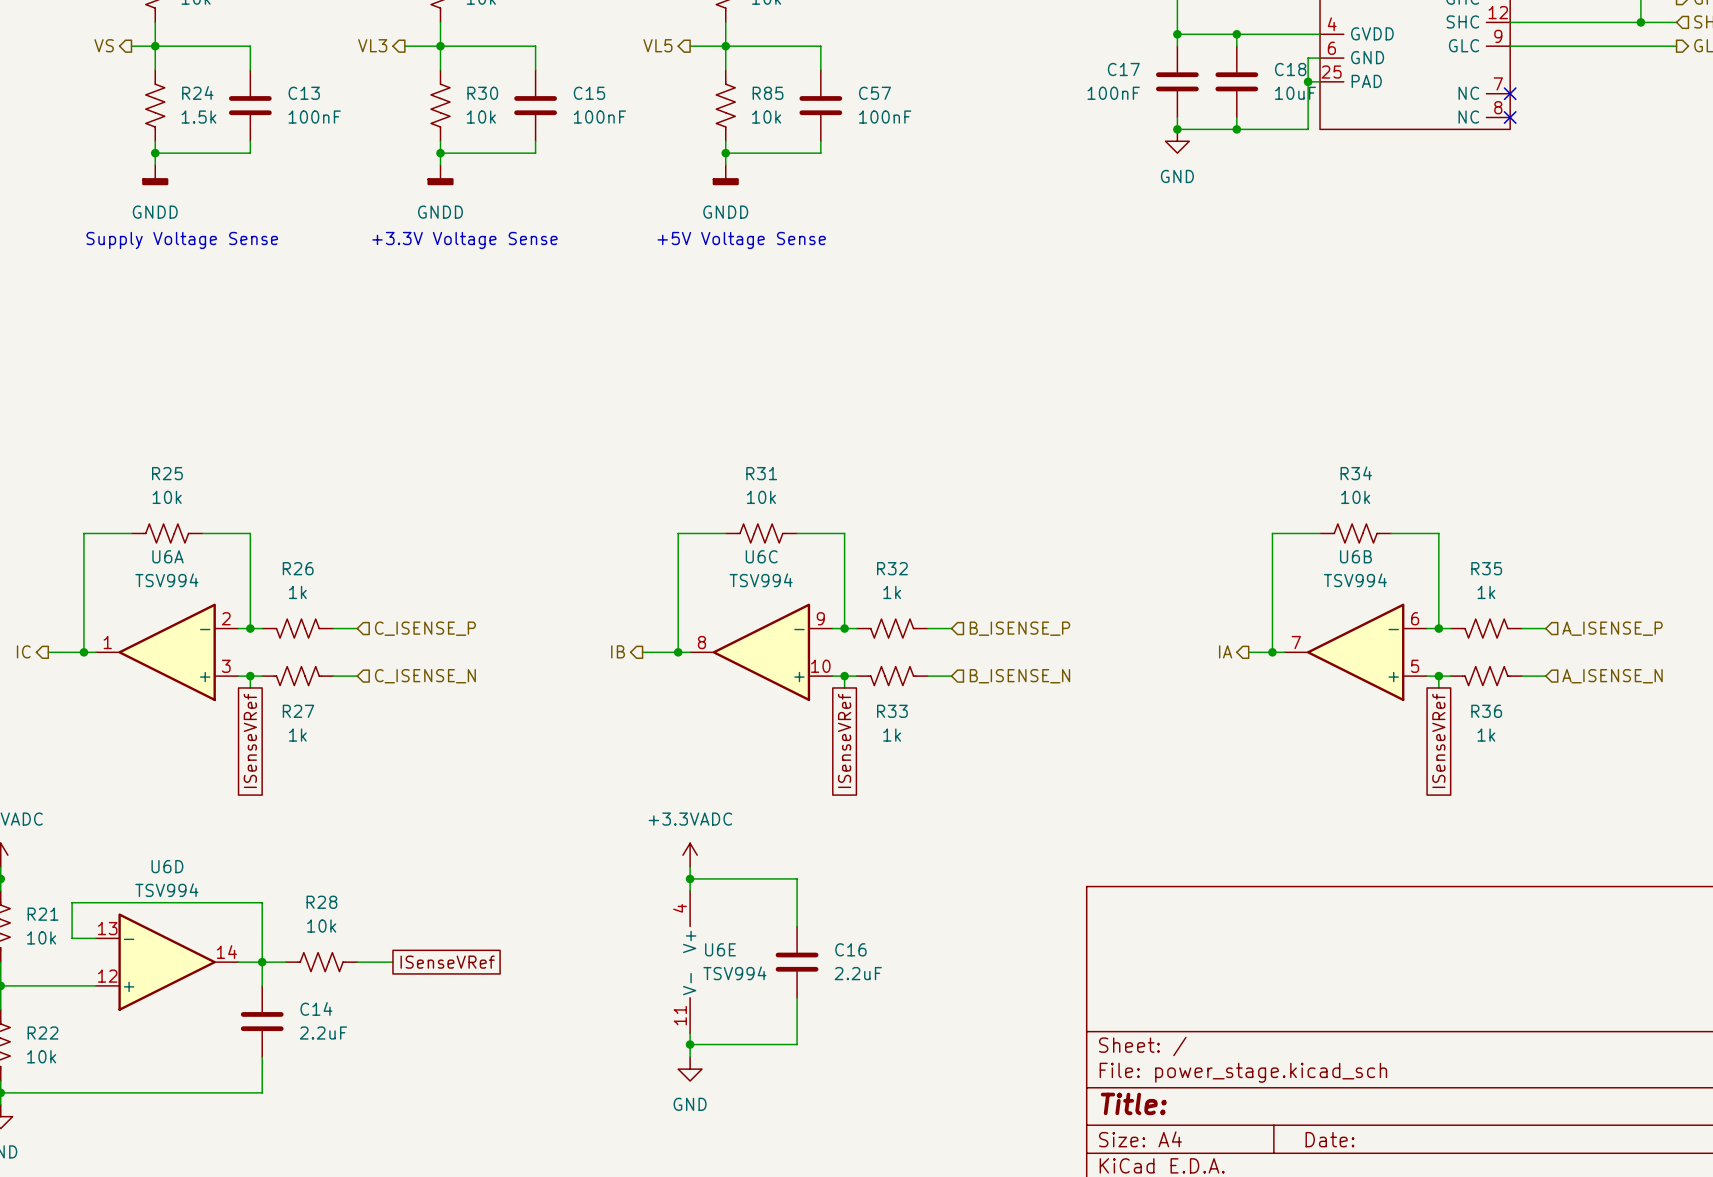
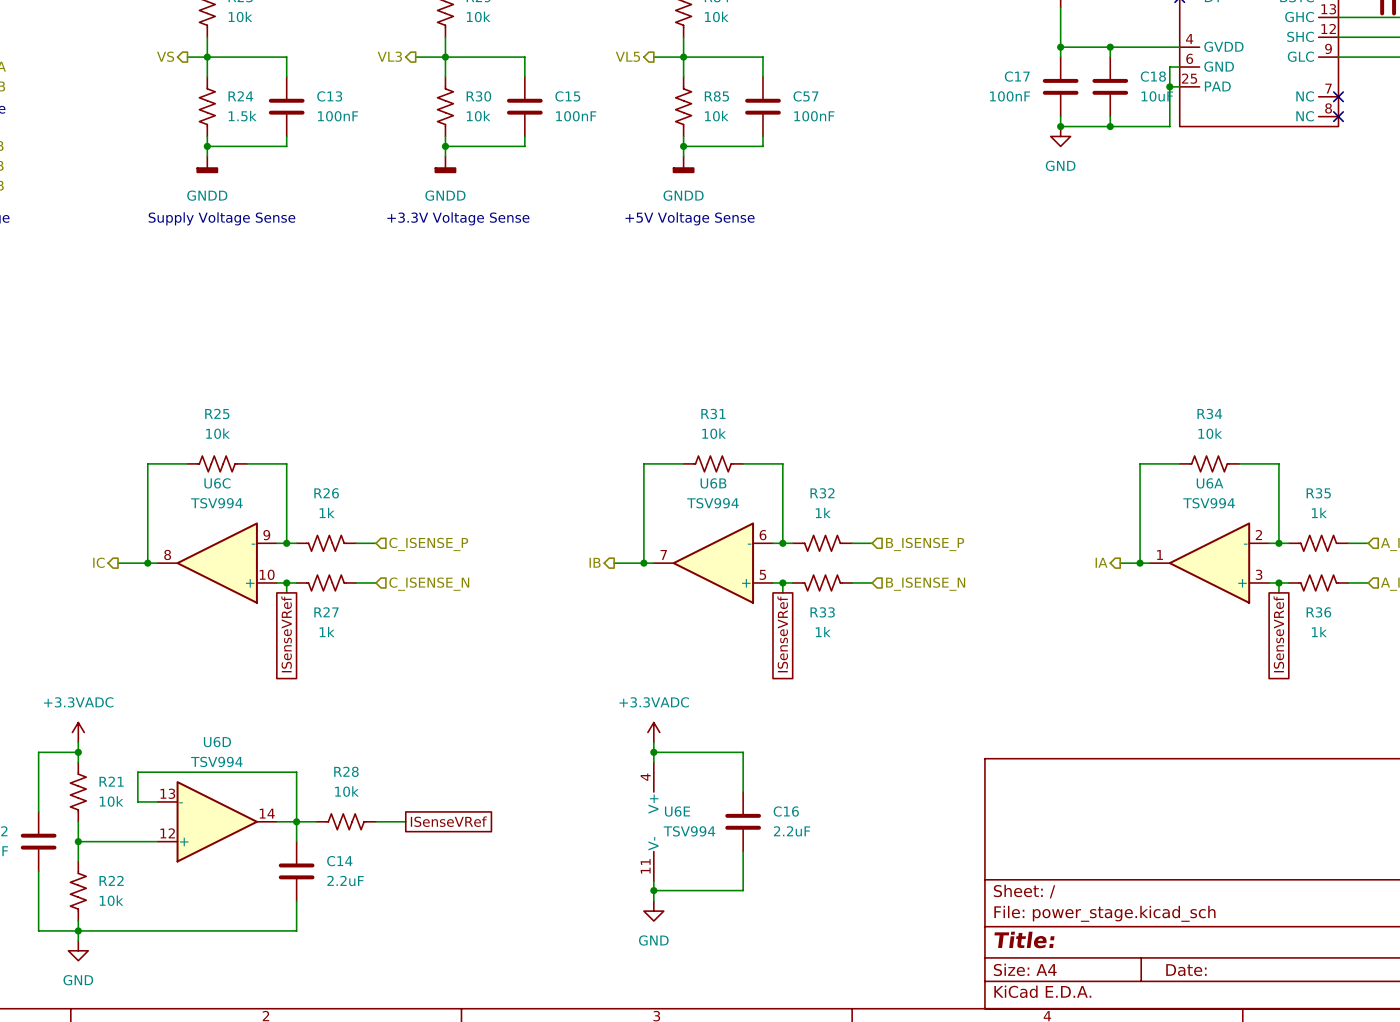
U6A position: (167, 652) -> (1209, 563)
U6C position: (761, 652) -> (217, 563)
U6B position: (1355, 652) -> (713, 563)

